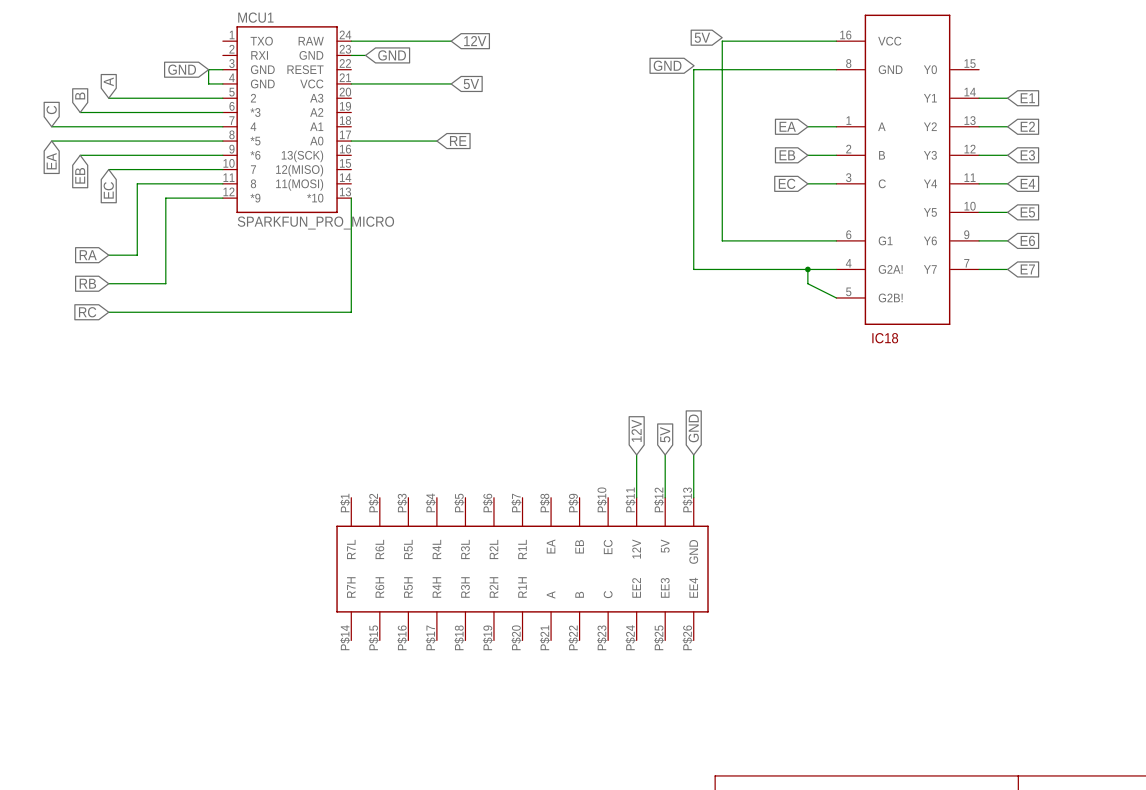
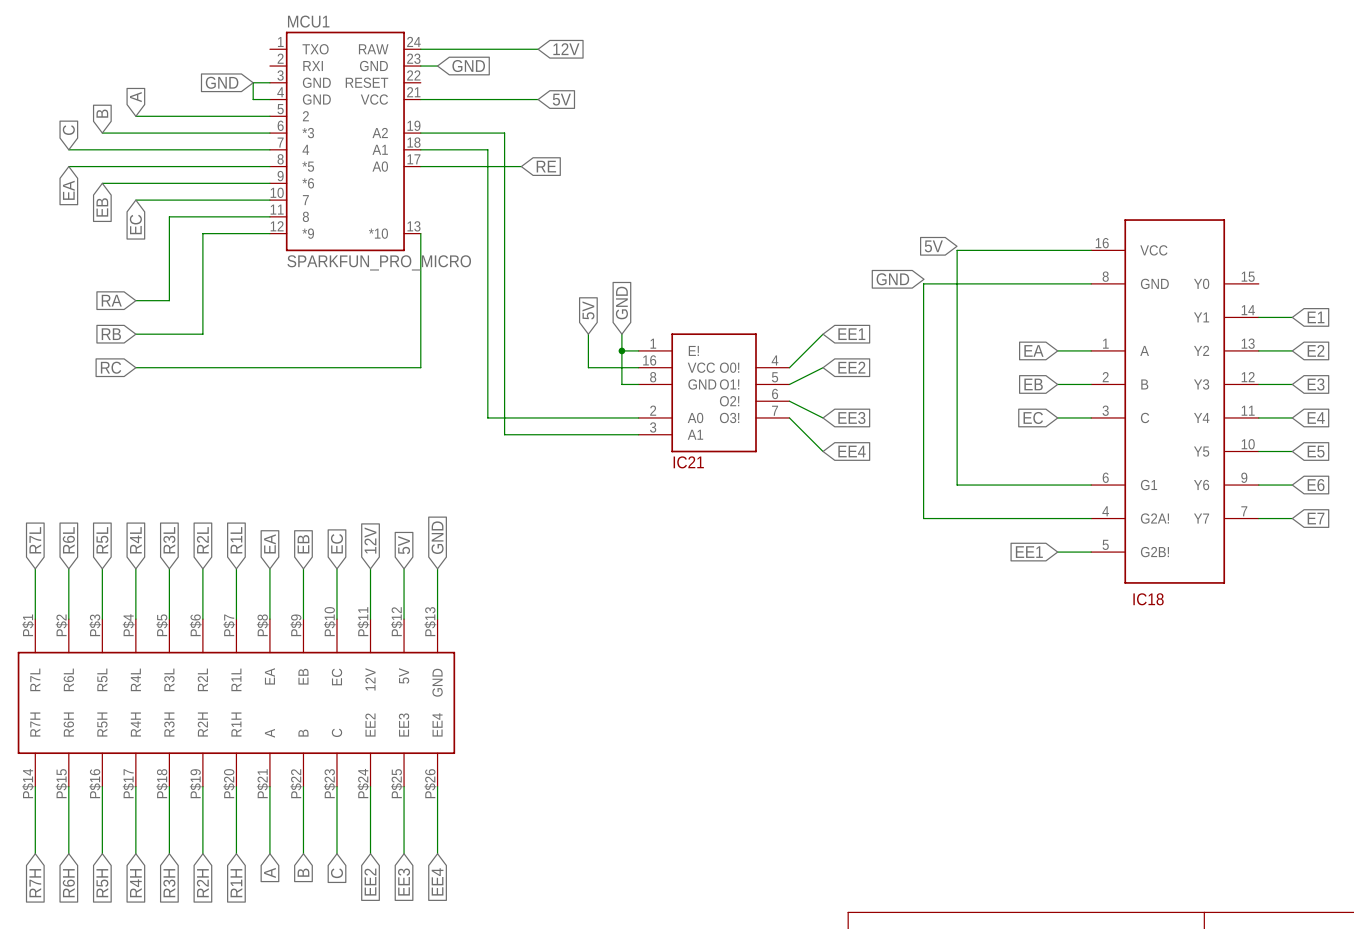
MCU1 symbol: [222, 26, 352, 214] -> [269, 31, 421, 252]
global label: 5V (702, 37) -> none
wire: (836, 41) (722, 41) (722, 240) (779, 240) -> (1091, 518) (923, 518) (923, 283)
global label: GND (667, 65) -> none
wire: (836, 69) (693, 69) (693, 269) (836, 269) -> none
wire: (979, 98) (1007, 98) -> none
global label: E1 (1027, 98) -> none
wire: none -> (420, 133) (504, 133) (504, 434) (638, 434)
wire: none -> (420, 149) (487, 149) (487, 417) (638, 417)
global label: EA (787, 126) -> none
wire: (807, 126) (836, 126) -> none
wire: (979, 126) (1007, 126) -> none
global label: E2 (1027, 126) -> none
global label: EB (787, 155) -> none
wire: (807, 155) (836, 155) -> none
wire: (979, 155) (1007, 155) -> none
global label: E3 (1027, 155) -> none
IC18 position: (907, 169) -> (1175, 401)
global label: EC (787, 183) -> none
wire: (807, 183) (836, 183) -> none
wire: (979, 183) (1007, 183) -> (1258, 317) (1292, 317)
global label: E4 (1027, 183) -> none
global label: none -> 5V (933, 246)
wire: none -> (1091, 250) (957, 250) (957, 317)
wire: (979, 212) (1007, 212) -> (1258, 350) (1292, 350)
global label: E5 (1027, 212) -> none
global label: none -> GND (892, 279)
wire: none -> (990, 283) (1091, 283)
wire: (979, 240) (1007, 240) -> (1258, 384) (1292, 384)
global label: E6 (1027, 240) -> none
global label: none -> GND (621, 303)
global label: none -> 5V (588, 310)
junction: (807, 269) -> none
wire: (979, 269) (1007, 269) -> (1258, 417) (1292, 417)
global label: E7 (1027, 269) -> none
global label: none -> E1 (1316, 317)
wire: none -> (588, 334) (588, 367) (638, 367)
wire: none -> (621, 334) (621, 384) (638, 384)
wire: none -> (823, 334) (789, 367)
global label: none -> EE1 (851, 334)
wire: (807, 283) (836, 297) -> (957, 334) (957, 485) (1091, 485)
wire: none -> (621, 350) (638, 350)
junction: none -> (621, 350)
global label: none -> EA (1033, 350)
wire: none -> (1057, 350) (1091, 350)
global label: none -> E2 (1316, 350)
wire: none -> (823, 367) (789, 384)
global label: none -> EE2 (851, 367)
global label: none -> EB (1033, 384)
wire: none -> (1057, 384) (1091, 384)
global label: none -> E3 (1316, 384)
IC21: none -> (714, 392)
wire: none -> (789, 401) (823, 417)
wire: none -> (789, 417) (823, 451)
global label: none -> EE3 (851, 417)
global label: none -> EC (1033, 417)
wire: none -> (1057, 417) (1091, 417)
global label: none -> E4 (1316, 417)
global label: none -> EE4 (852, 451)
wire: none -> (1258, 451) (1292, 451)
global label: none -> E5 (1316, 451)
wire: none -> (1258, 485) (1292, 485)
global label: none -> E6 (1316, 485)
global label: GND (693, 428) -> none
global label: 12V (636, 430) -> none
global label: 5V (665, 434) -> none
wire: none -> (1258, 518) (1292, 518)
global label: none -> E7 (1316, 518)
wire: (636, 454) (636, 497) -> none
wire: (665, 454) (665, 497) -> none
wire: (693, 454) (693, 497) -> none
global label: none -> GND (437, 537)
global label: none -> R7L (35, 540)
global label: none -> R6L (68, 540)
global label: none -> R5L (102, 540)
global label: none -> R4L (135, 540)
global label: none -> R3L (169, 540)
global label: none -> R2L (202, 540)
global label: none -> R1L (236, 540)
global label: none -> 12V (370, 540)
global label: none -> EA (269, 543)
global label: none -> EB (303, 544)
global label: none -> EC (336, 543)
global label: none -> 5V (404, 545)
global label: none -> EE1 (1029, 552)
wire: none -> (1057, 552) (1091, 552)
wire: none -> (35, 568) (35, 619)
wire: none -> (68, 568) (68, 619)
wire: none -> (102, 568) (102, 619)
wire: none -> (135, 568) (135, 619)
wire: none -> (169, 568) (169, 619)
wire: none -> (202, 568) (202, 619)
wire: none -> (236, 568) (236, 619)
wire: none -> (269, 568) (269, 619)
wire: none -> (303, 568) (303, 619)
wire: none -> (336, 568) (336, 619)
wire: none -> (370, 568) (370, 619)
wire: none -> (404, 568) (404, 619)
wire: none -> (437, 568) (437, 619)
part: (522, 569) -> none
part: none -> (236, 702)
wire: none -> (35, 786) (35, 853)
wire: none -> (68, 786) (68, 853)
wire: none -> (102, 786) (102, 853)
wire: none -> (135, 786) (135, 853)
wire: none -> (169, 786) (169, 853)
wire: none -> (202, 786) (202, 853)
wire: none -> (236, 786) (236, 853)
wire: none -> (269, 786) (269, 853)
wire: none -> (303, 786) (303, 853)
wire: none -> (336, 786) (336, 853)
wire: none -> (370, 786) (370, 853)
wire: none -> (404, 786) (404, 853)
wire: none -> (437, 786) (437, 853)
global label: none -> A (269, 872)
global label: none -> B (303, 872)
global label: none -> C (336, 873)
global label: none -> EE2 (370, 882)
global label: none -> EE3 (404, 882)
global label: none -> EE4 (437, 881)
global label: none -> R7H (35, 883)
global label: none -> R6H (68, 883)
global label: none -> R5H (102, 883)
global label: none -> R4H (135, 883)
global label: none -> R3H (169, 883)
global label: none -> R2H (202, 883)
global label: none -> R1H (236, 883)

